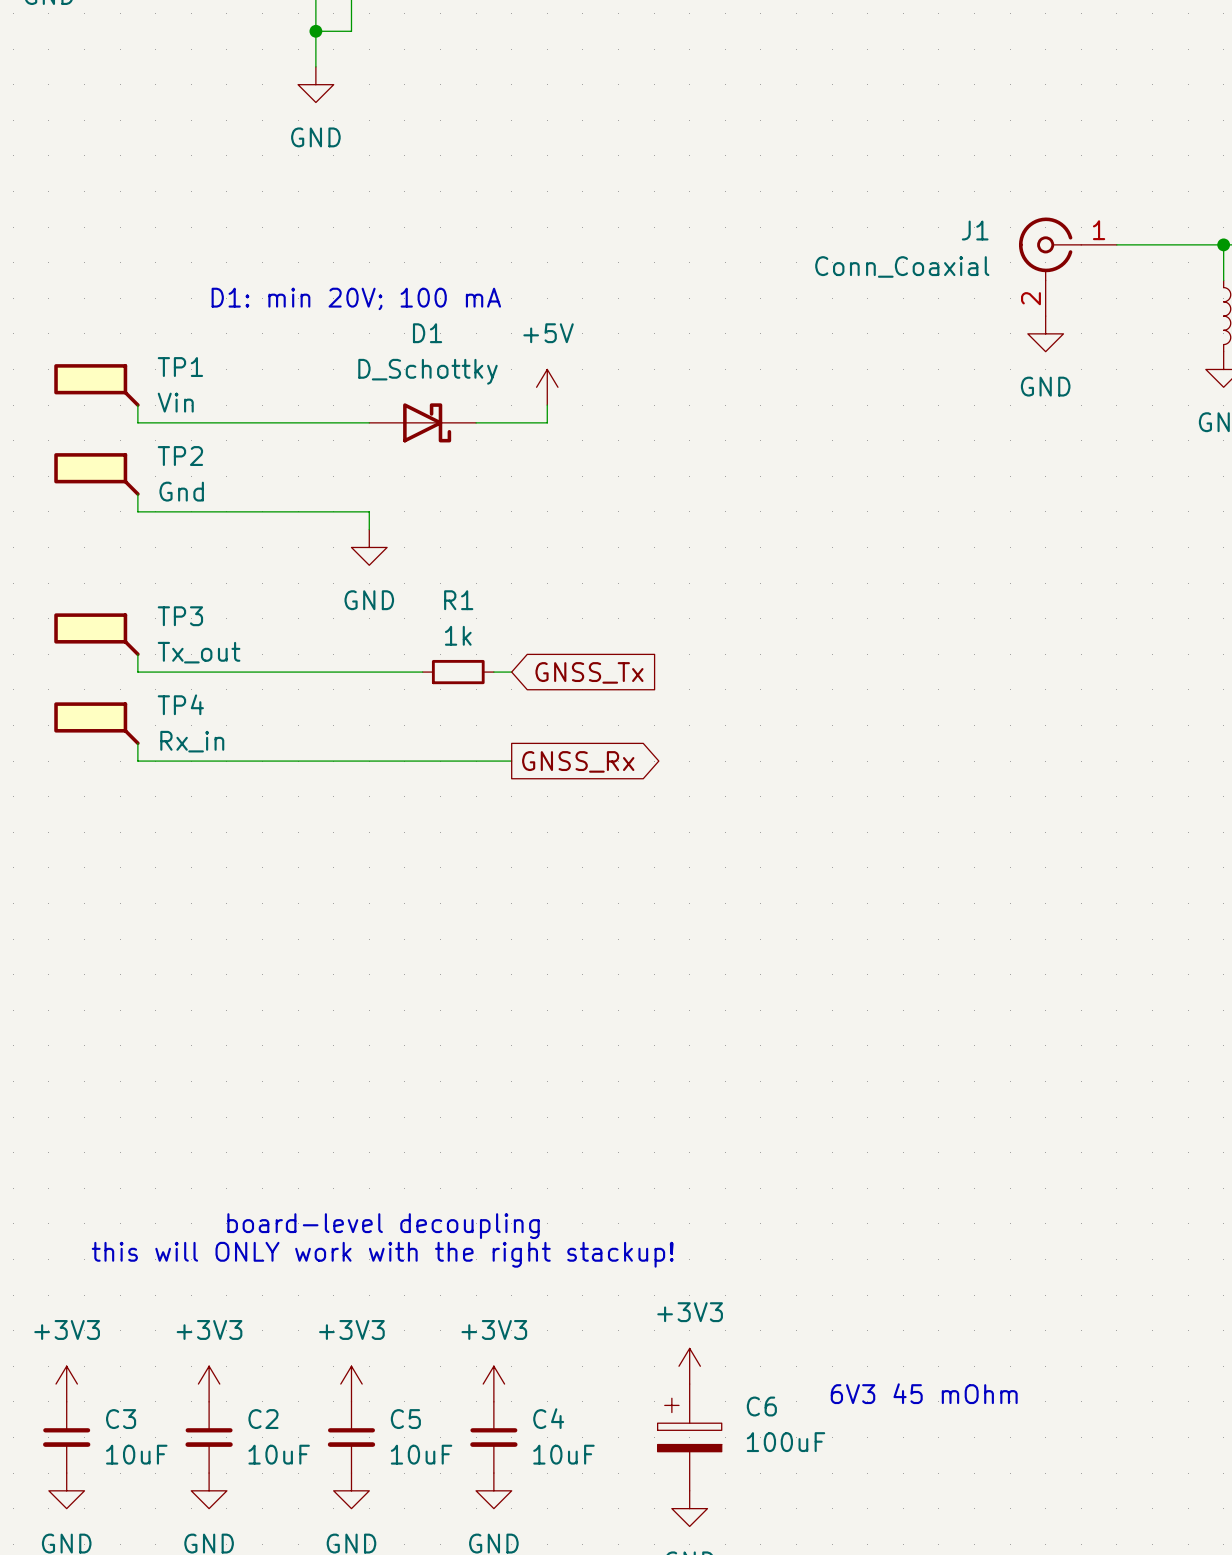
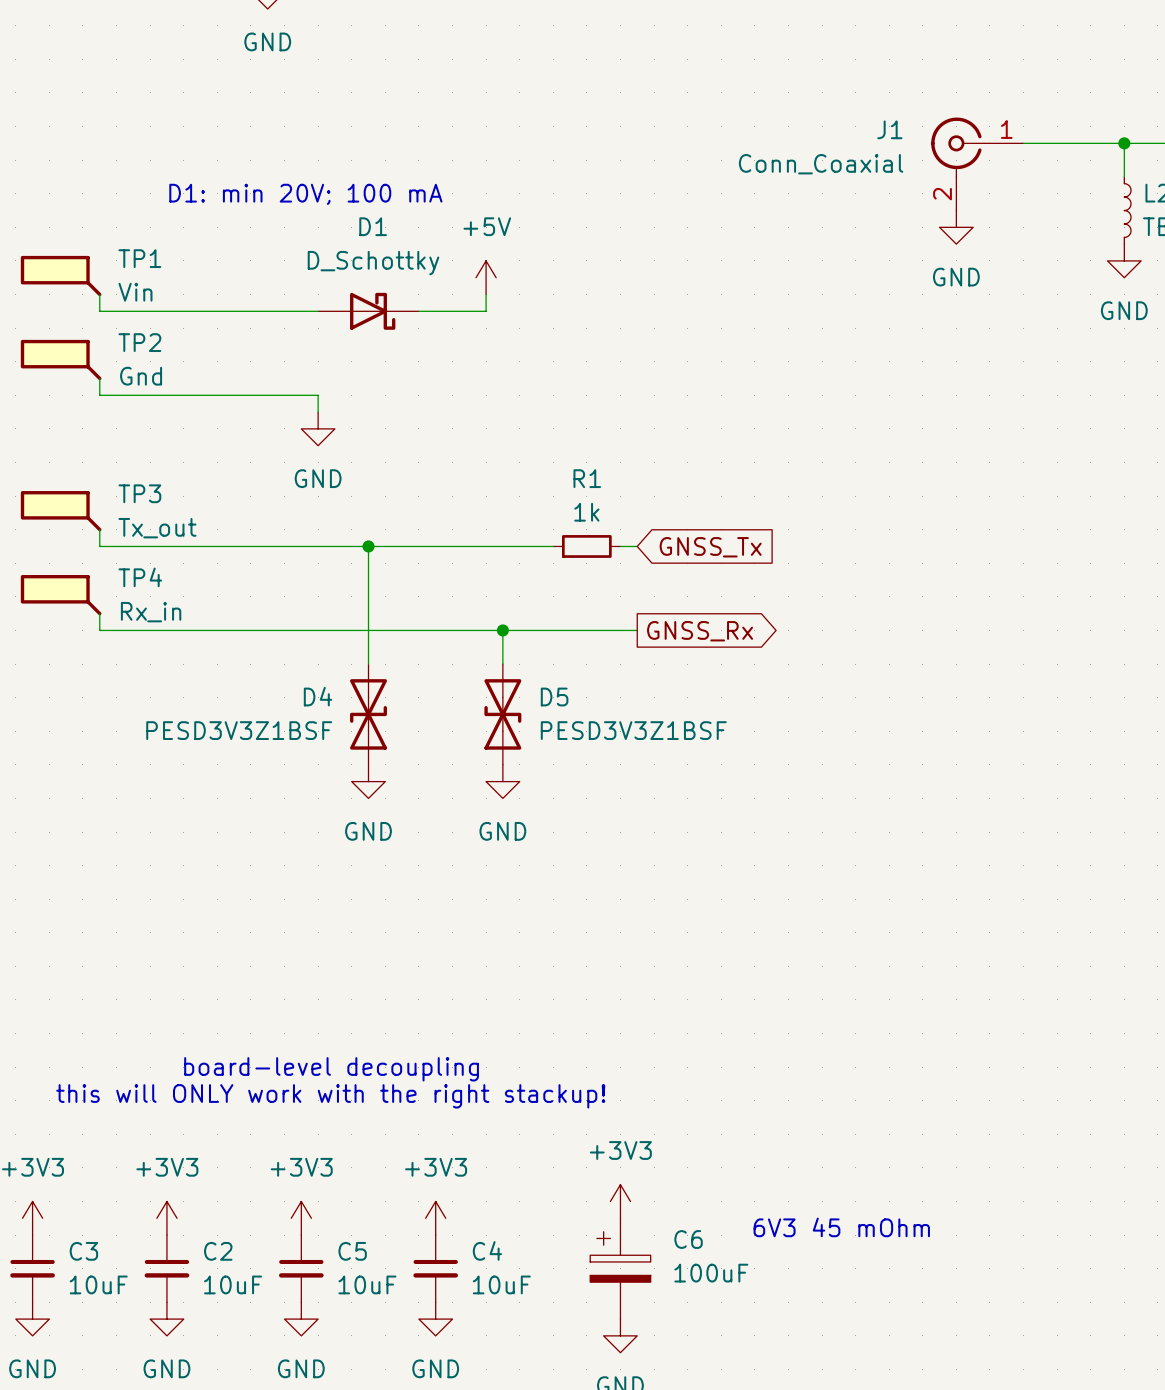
junction: none -> (368, 546)
R1 position: (458, 672) -> (586, 546)
wire: none -> (435, 546) (368, 546) (368, 664)
wire: none -> (452, 546) (553, 546)
global label position: GNSS_Tx (589, 672) -> GNSS_Tx (710, 547)
wire: none -> (620, 546) (637, 546)
wire: none -> (452, 630) (637, 630)
wire: none -> (502, 630) (502, 664)
junction: none -> (502, 630)
global label position: GNSS_Rx (578, 761) -> GNSS_Rx (700, 631)
D4: none -> PESD3V3Z1BSF (368, 714)
D5: none -> PESD3V3Z1BSF (502, 714)
power symbol: none -> GND (368, 781)
power symbol: none -> GND (502, 781)

